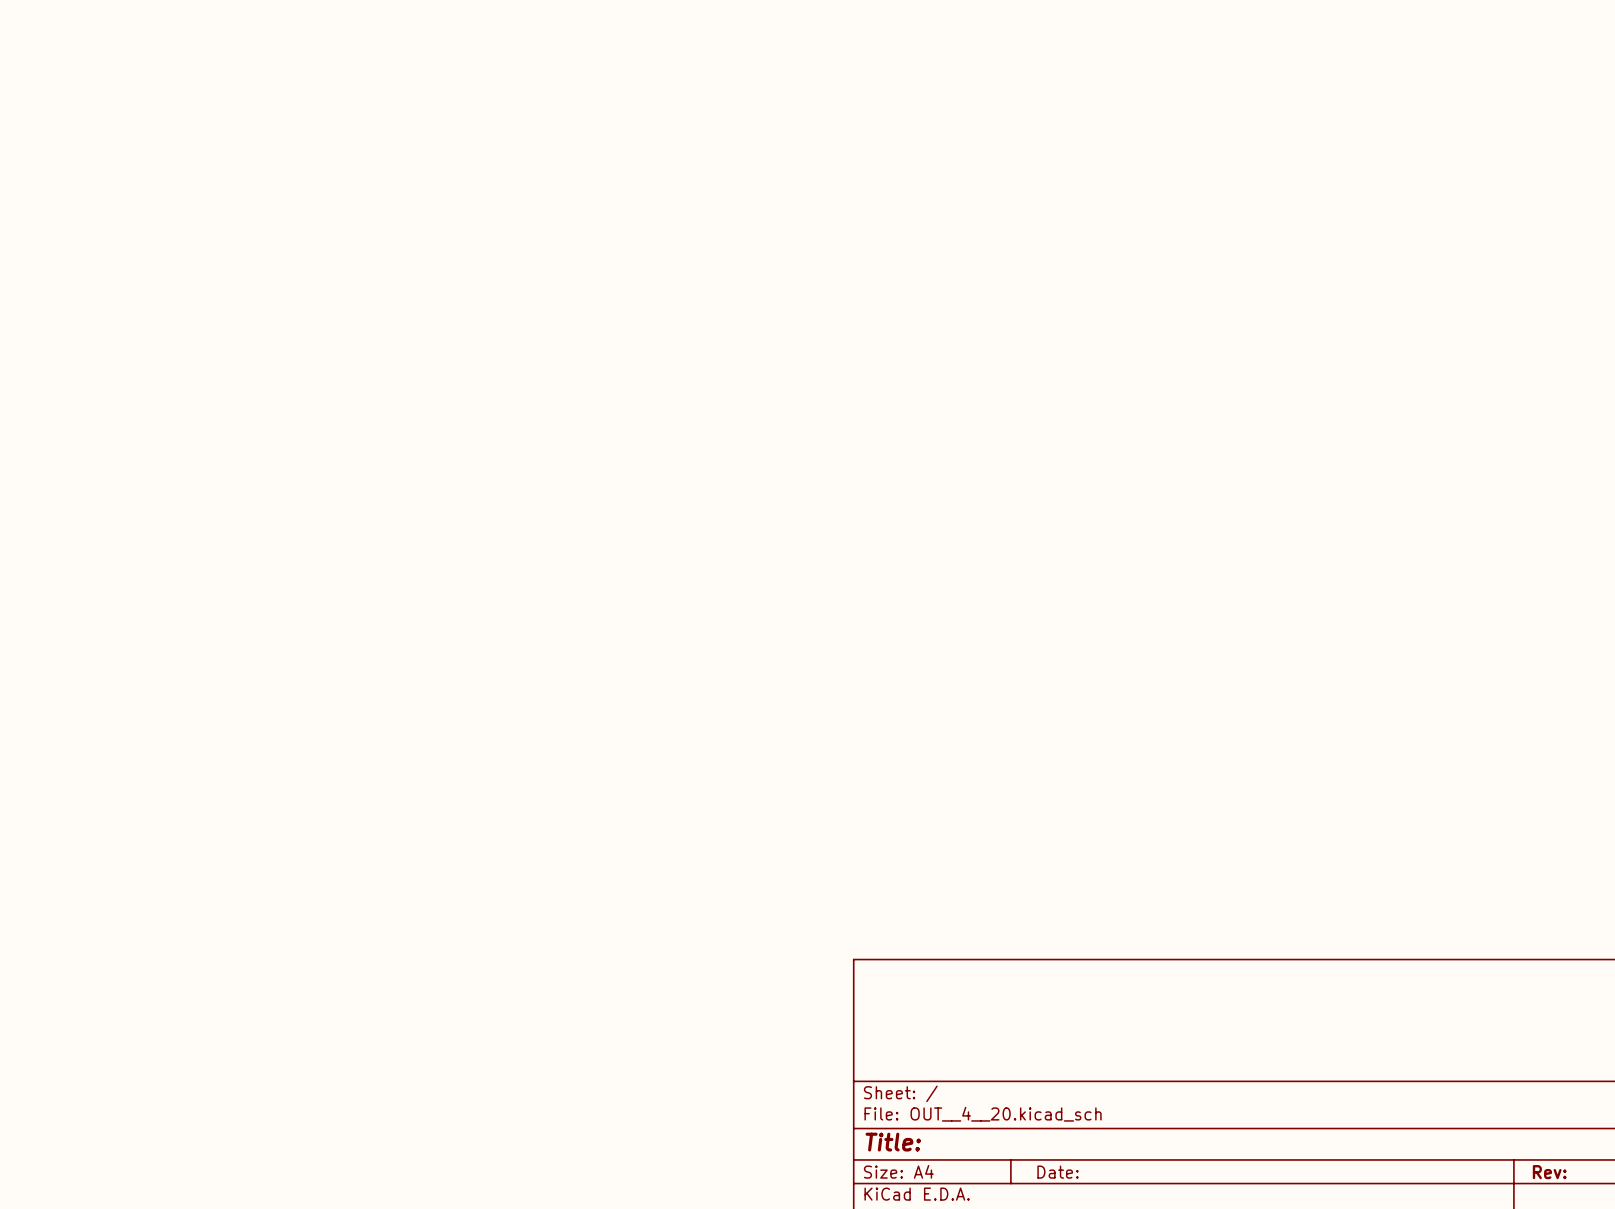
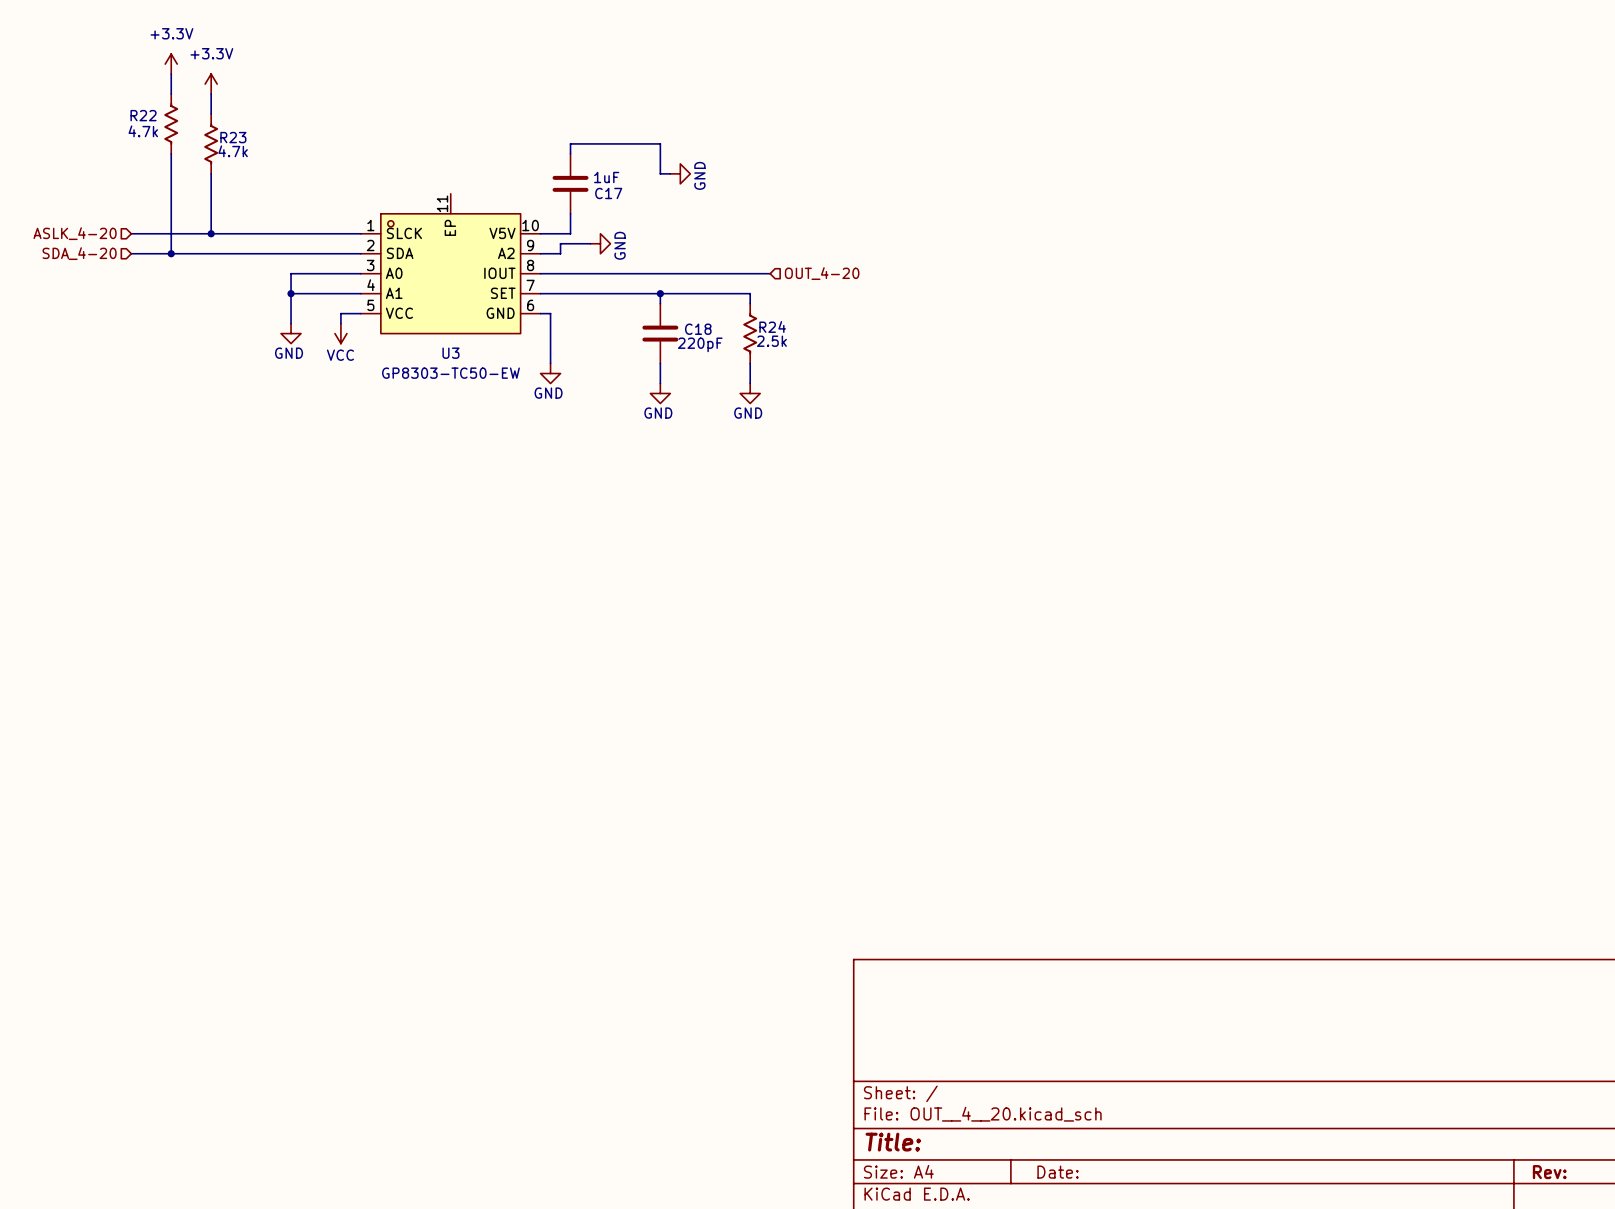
power symbol: none -> +3.3V (171, 64)
wire: none -> (171, 74) (171, 94)
power symbol: none -> +3.3V (211, 84)
wire: none -> (211, 94) (211, 113)
R22: none -> (171, 123)
R23: none -> (211, 143)
wire: none -> (171, 153) (171, 253)
wire: none -> (570, 153) (570, 143) (660, 143) (660, 173) (670, 173)
wire: none -> (211, 173) (211, 233)
power symbol: none -> GND (680, 173)
C17: none -> (570, 183)
wire: none -> (570, 213) (570, 233) (540, 233)
hierarchical label: none -> ASLK_4-20 (75, 233)
wire: none -> (131, 233) (360, 233)
junction: none -> (211, 233)
wire: none -> (590, 243) (560, 243) (560, 253) (540, 253)
power symbol: none -> GND (600, 243)
hierarchical label: none -> SDA_4-20 (79, 253)
wire: none -> (131, 253) (360, 253)
junction: none -> (171, 253)
U3: none -> GP8303-TC50-EW (450, 263)
wire: none -> (360, 273) (291, 273) (291, 323)
wire: none -> (540, 273) (770, 273)
hierarchical label: none -> OUT_4-20 (822, 273)
wire: none -> (291, 293) (360, 293)
junction: none -> (291, 293)
wire: none -> (540, 293) (750, 293) (750, 303)
wire: none -> (660, 293) (660, 303)
junction: none -> (660, 293)
wire: none -> (360, 313) (340, 313) (340, 323)
wire: none -> (540, 313) (550, 313) (550, 363)
power symbol: none -> GND (291, 333)
power symbol: none -> VCC (340, 333)
C18: none -> (660, 333)
R24: none -> (750, 333)
wire: none -> (660, 363) (660, 383)
wire: none -> (750, 363) (750, 383)
power symbol: none -> GND (550, 373)
power symbol: none -> GND (660, 393)
power symbol: none -> GND (750, 393)

